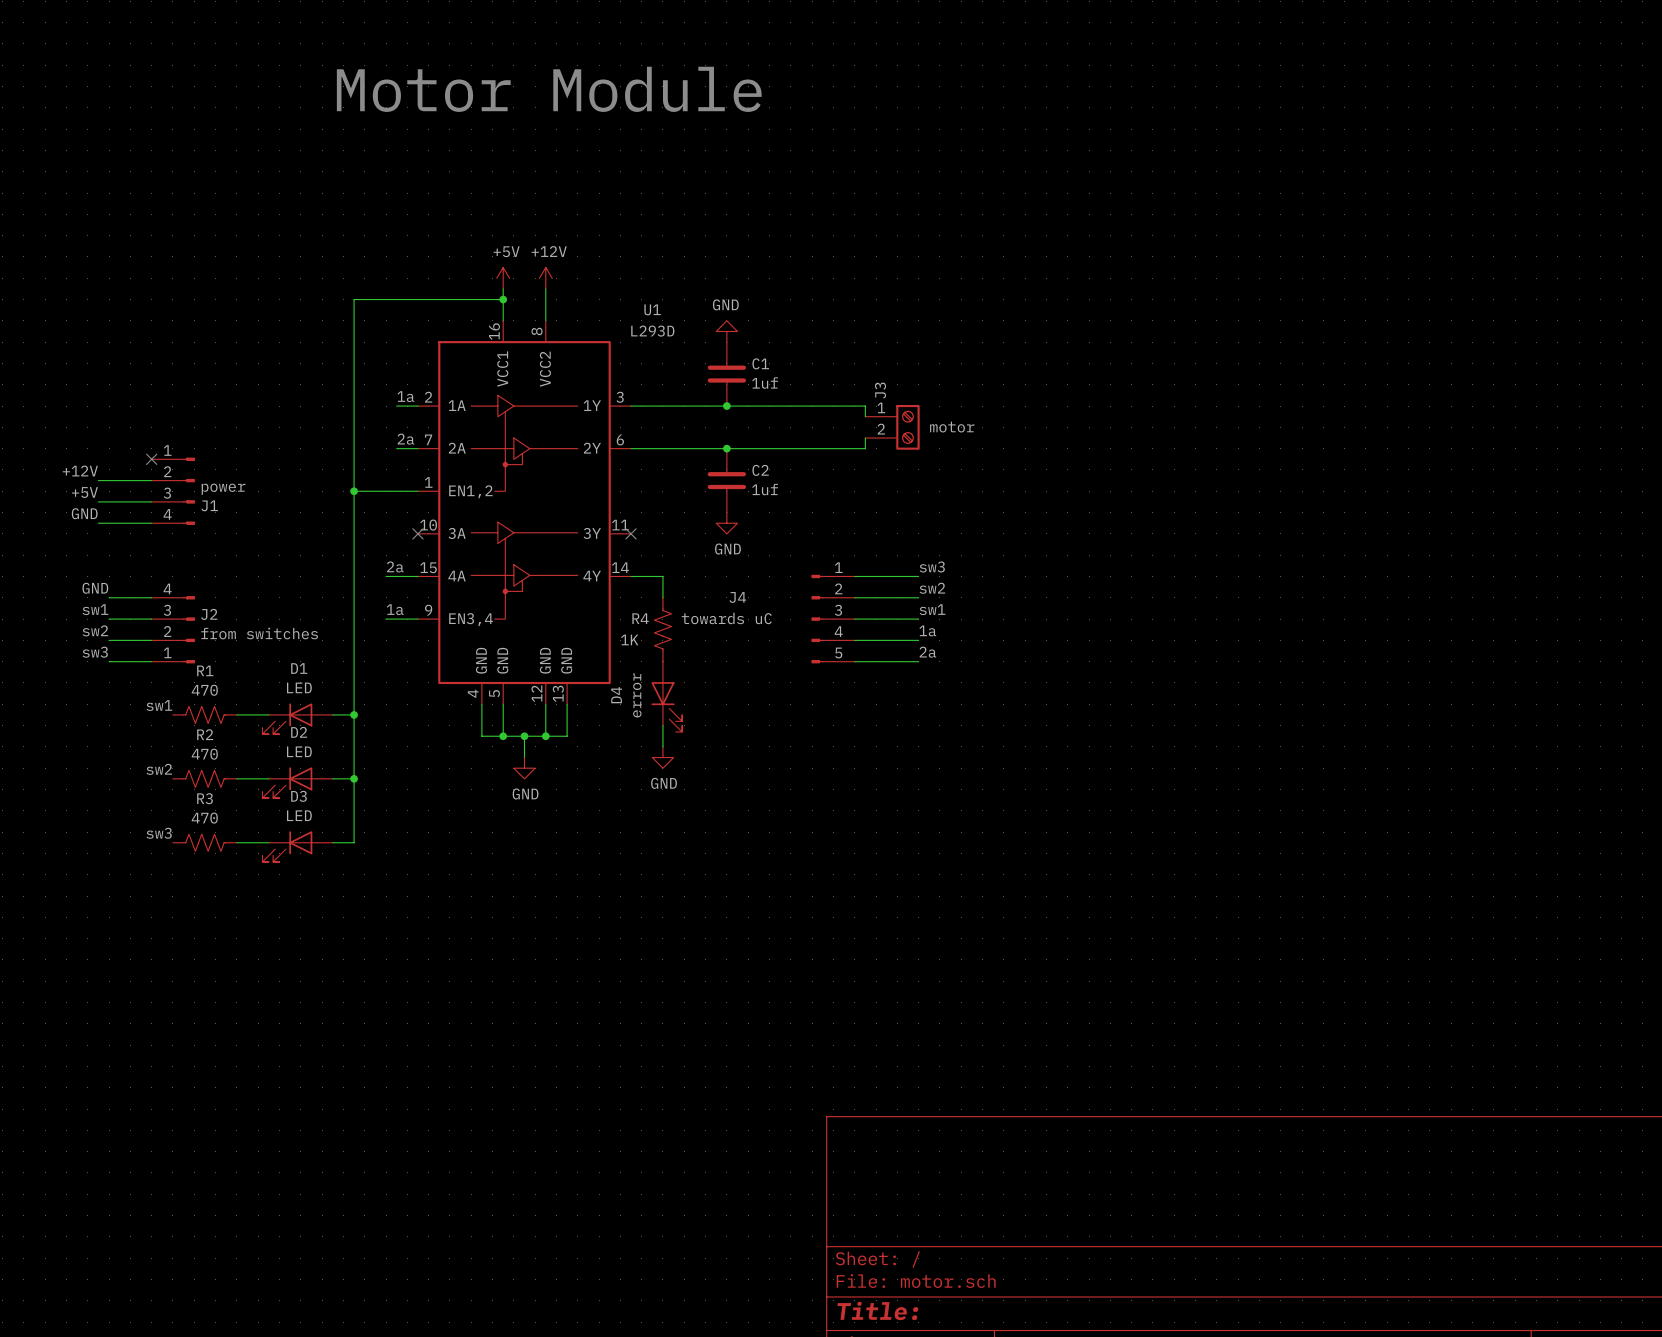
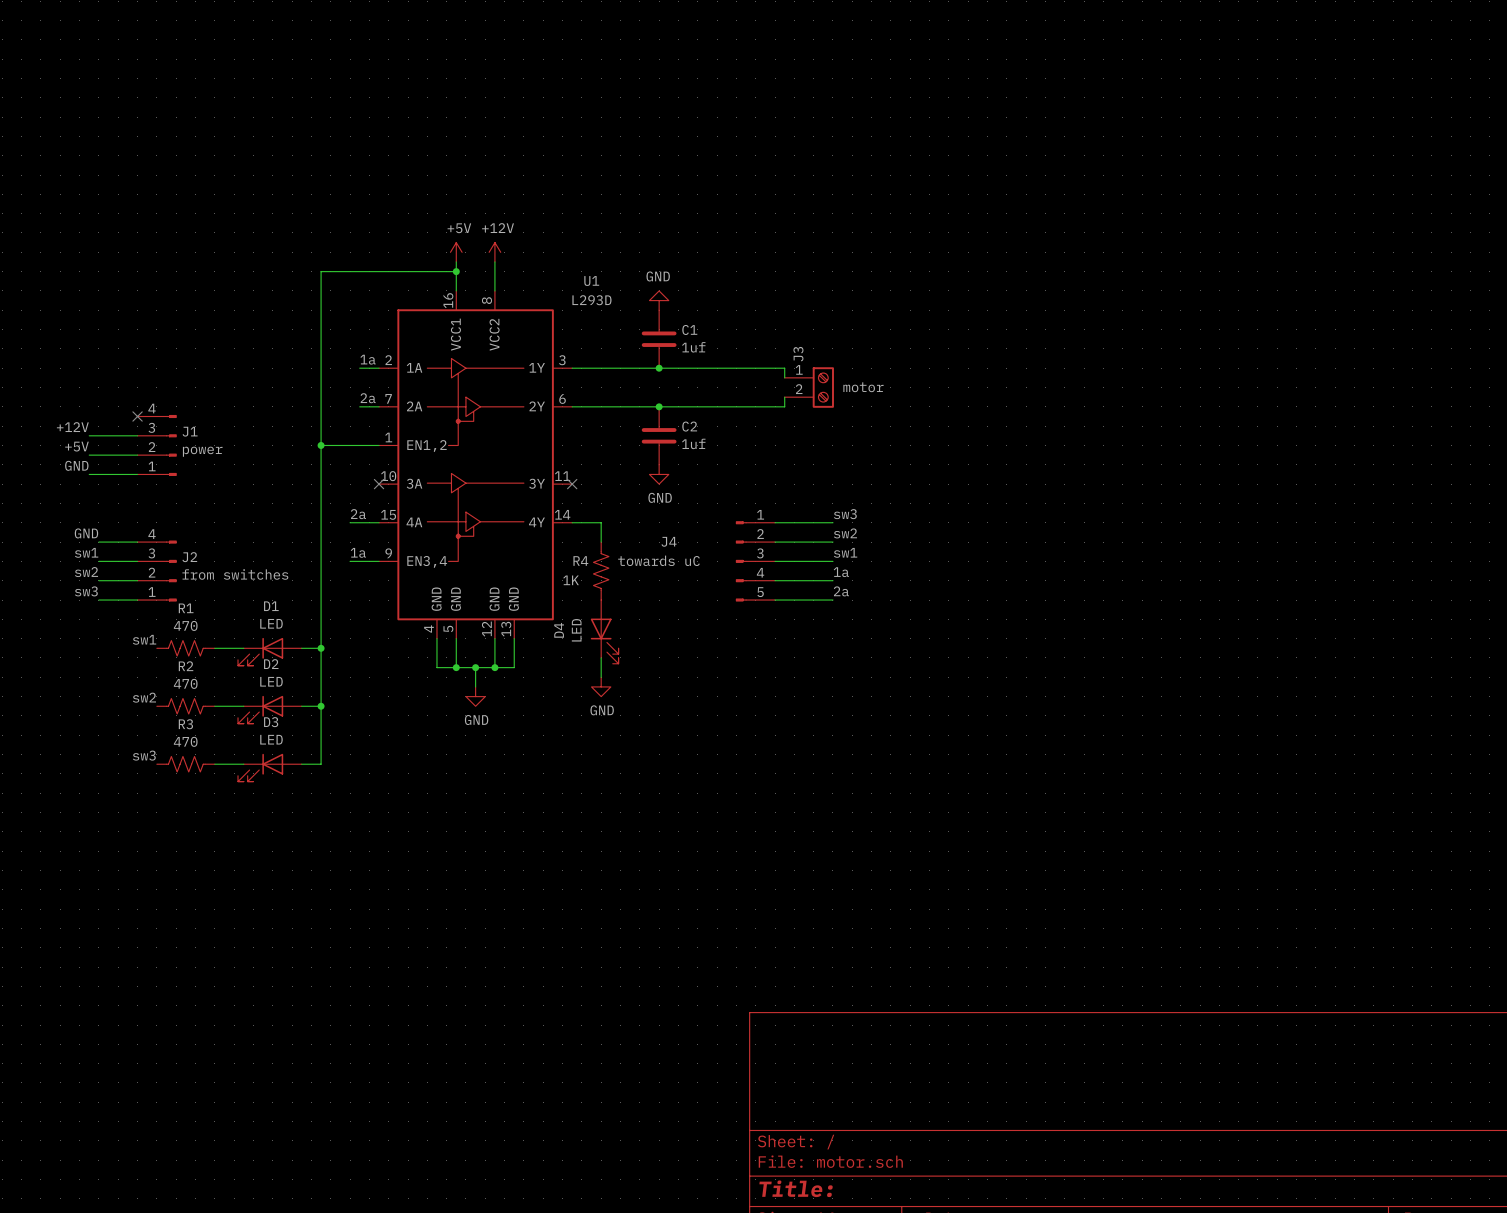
text: Motor Module (549, 89) -> none
J1 flip: as is (188, 491) -> up-down (171, 445)
D4 value: error (637, 695) -> LED (576, 630)

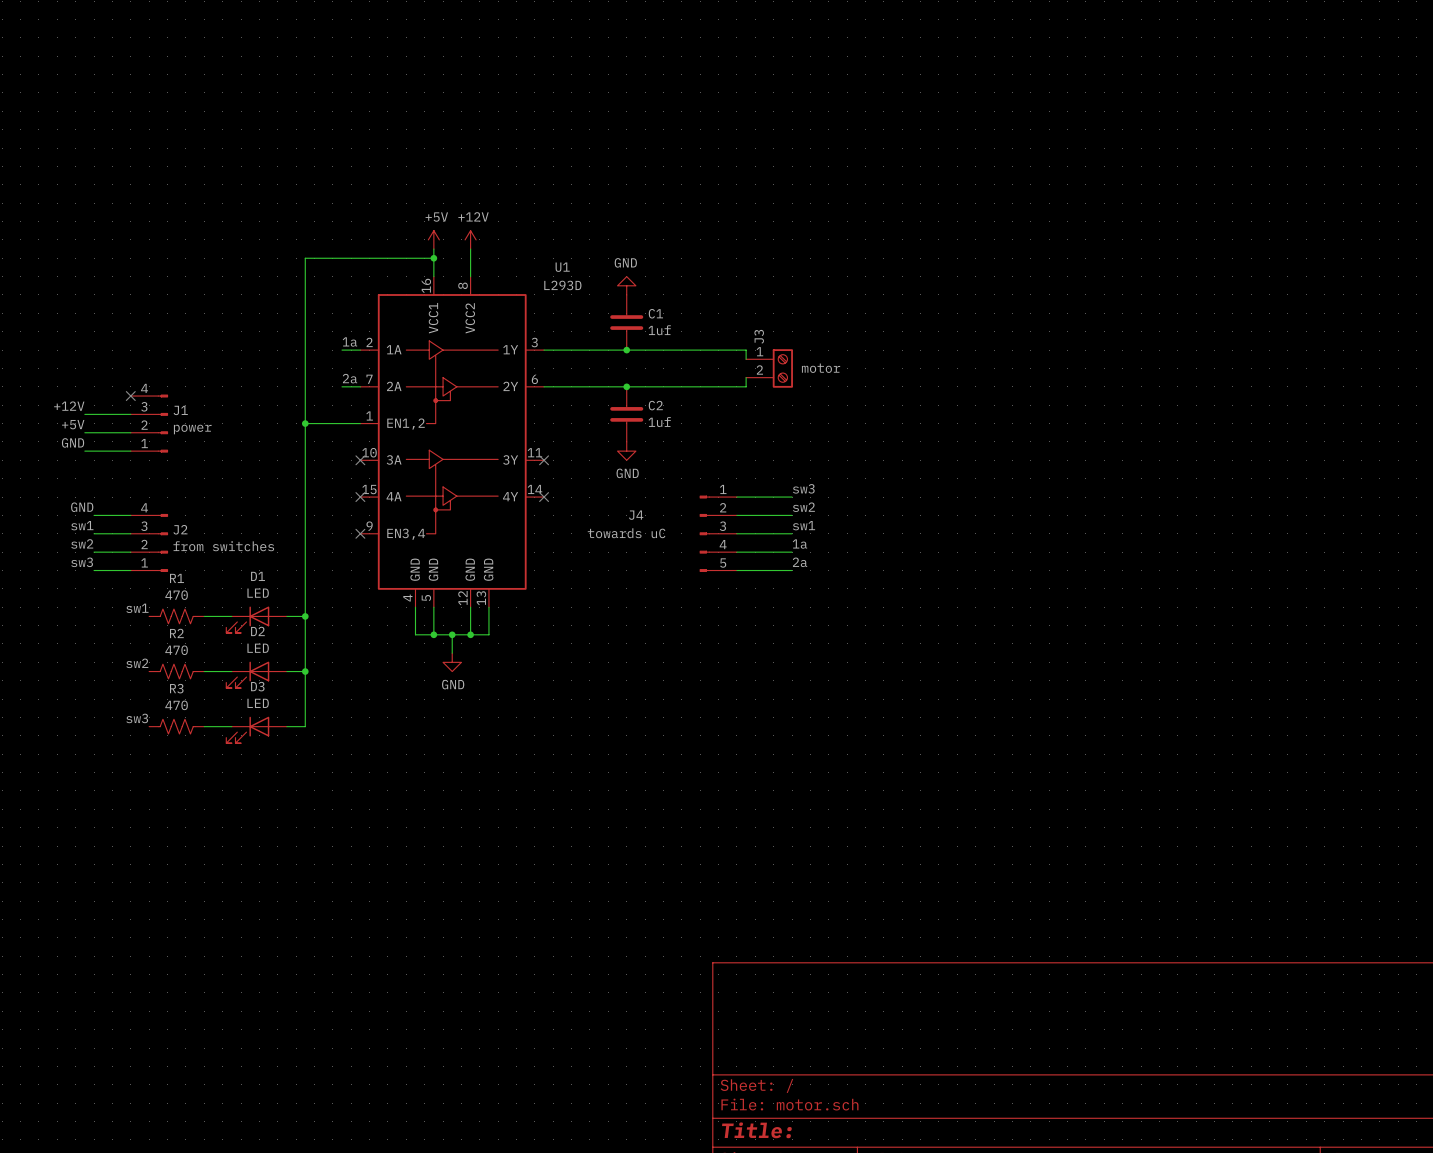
label: 2a (358, 514) -> none
wire: (350, 522) (379, 522) -> none
no-connect mark: none -> (360, 497)
wire: (572, 522) (601, 522) (601, 542) -> none
no-connect mark: none -> (544, 497)
label: 1a (358, 552) -> none
wire: (350, 561) (379, 561) -> none
no-connect mark: none -> (360, 533)
R4: 1K (601, 571) -> none
D4: LED (604, 631) -> none
wire: (601, 657) (601, 677) -> none
power symbol: GND (601, 686) -> none

